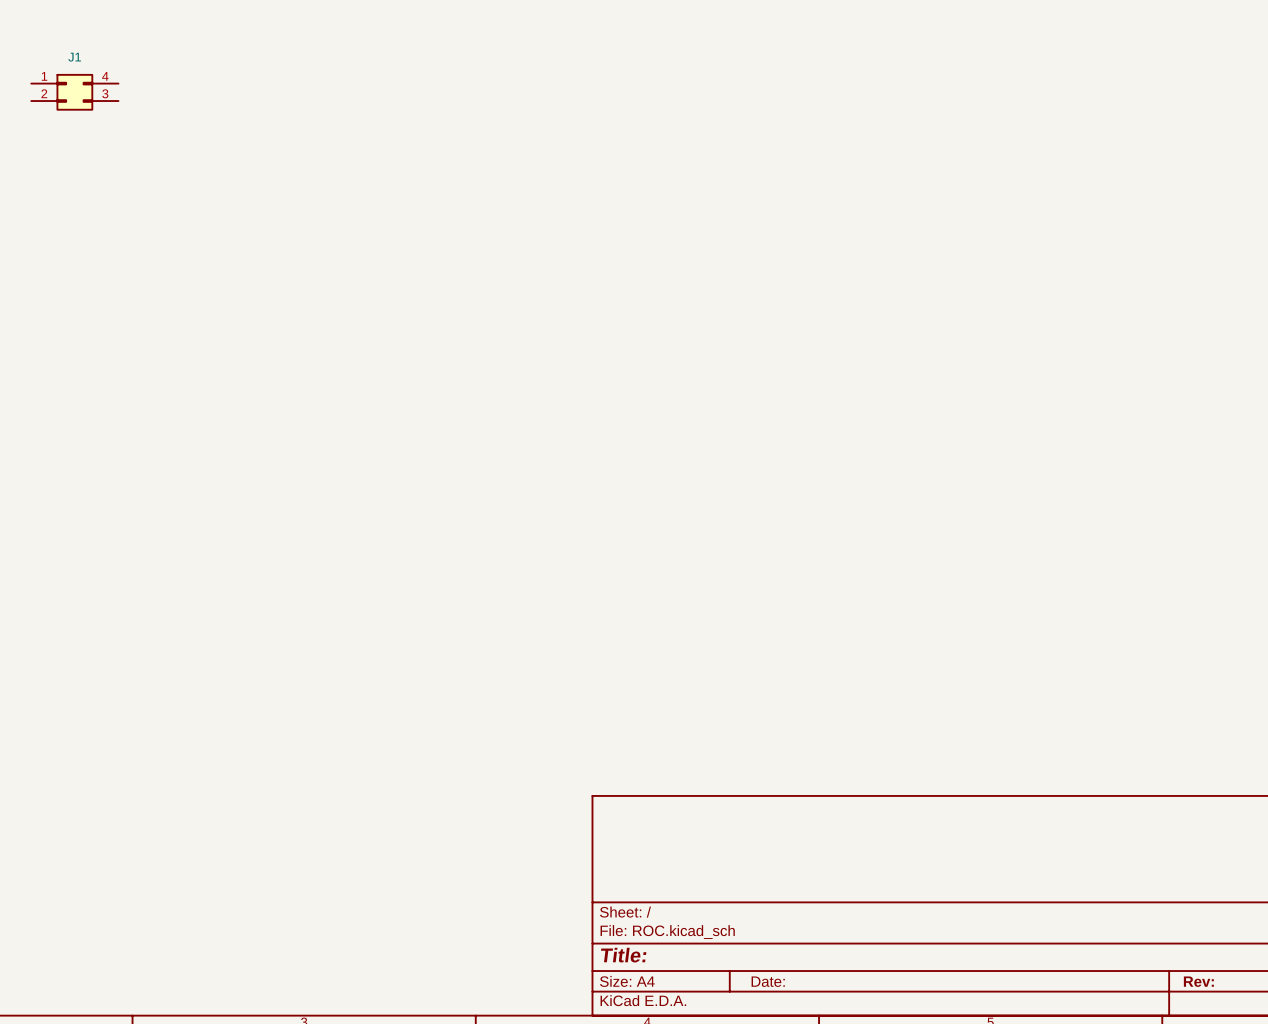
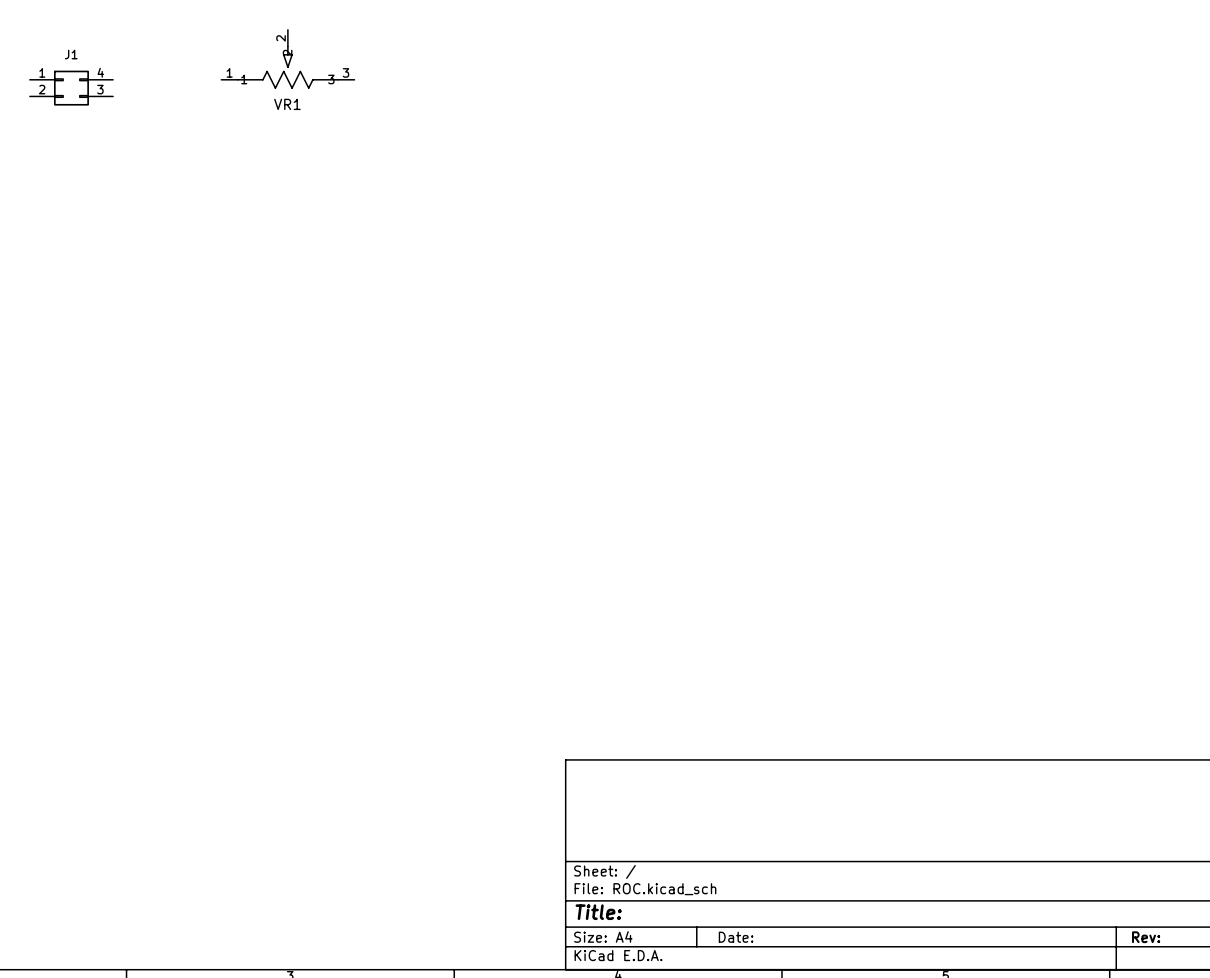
VR1: none -> (287, 59)

